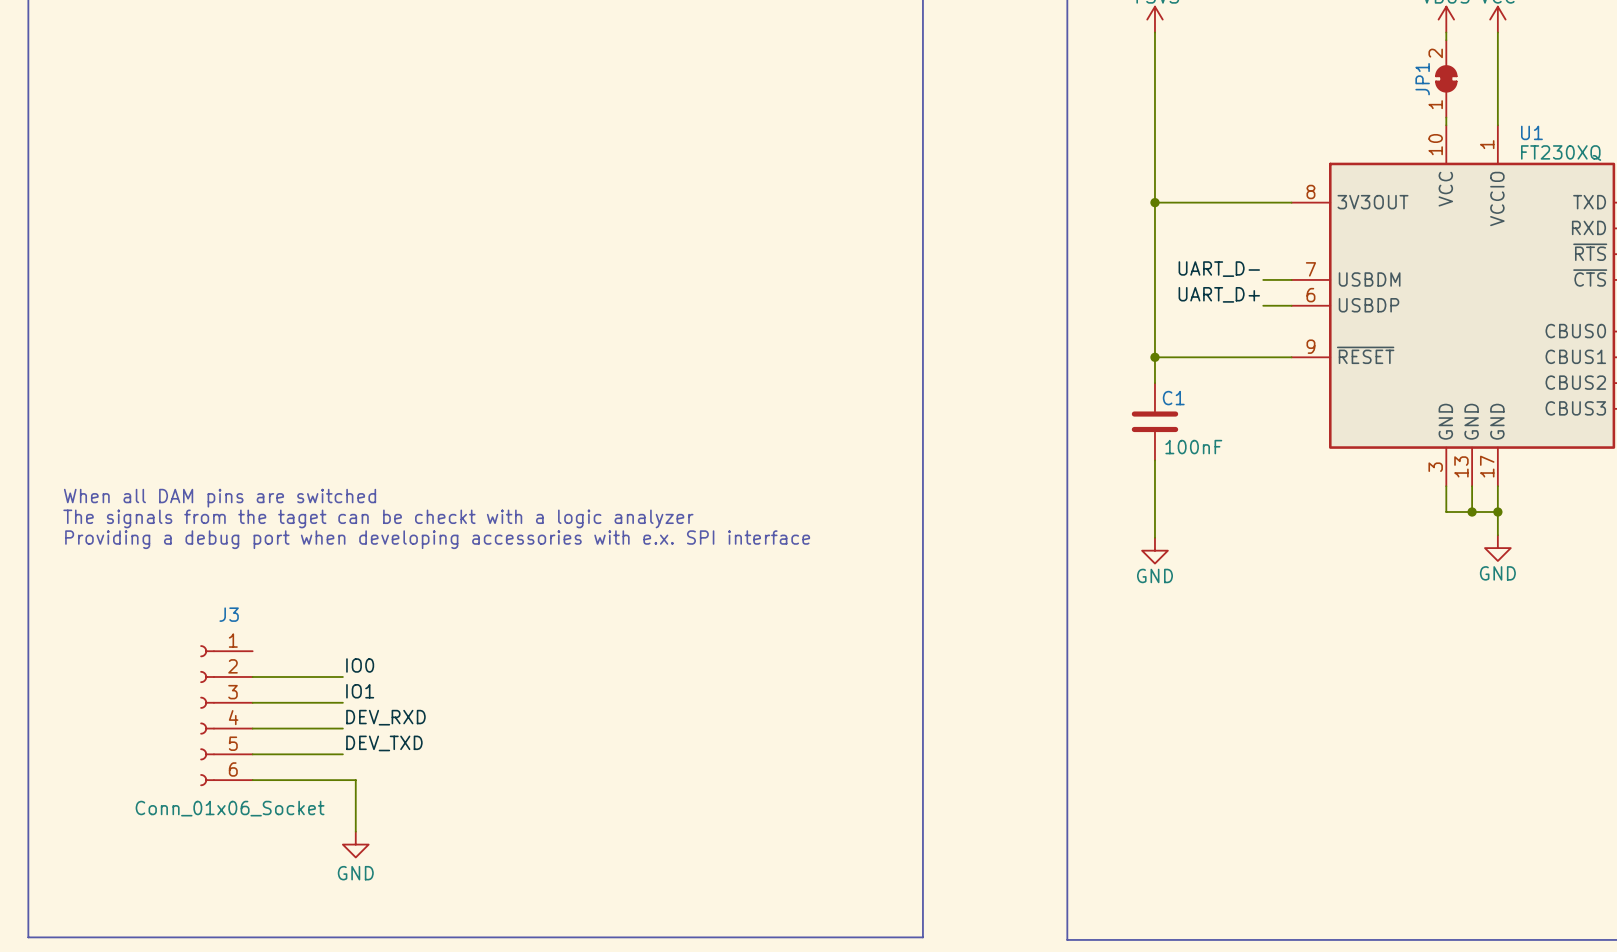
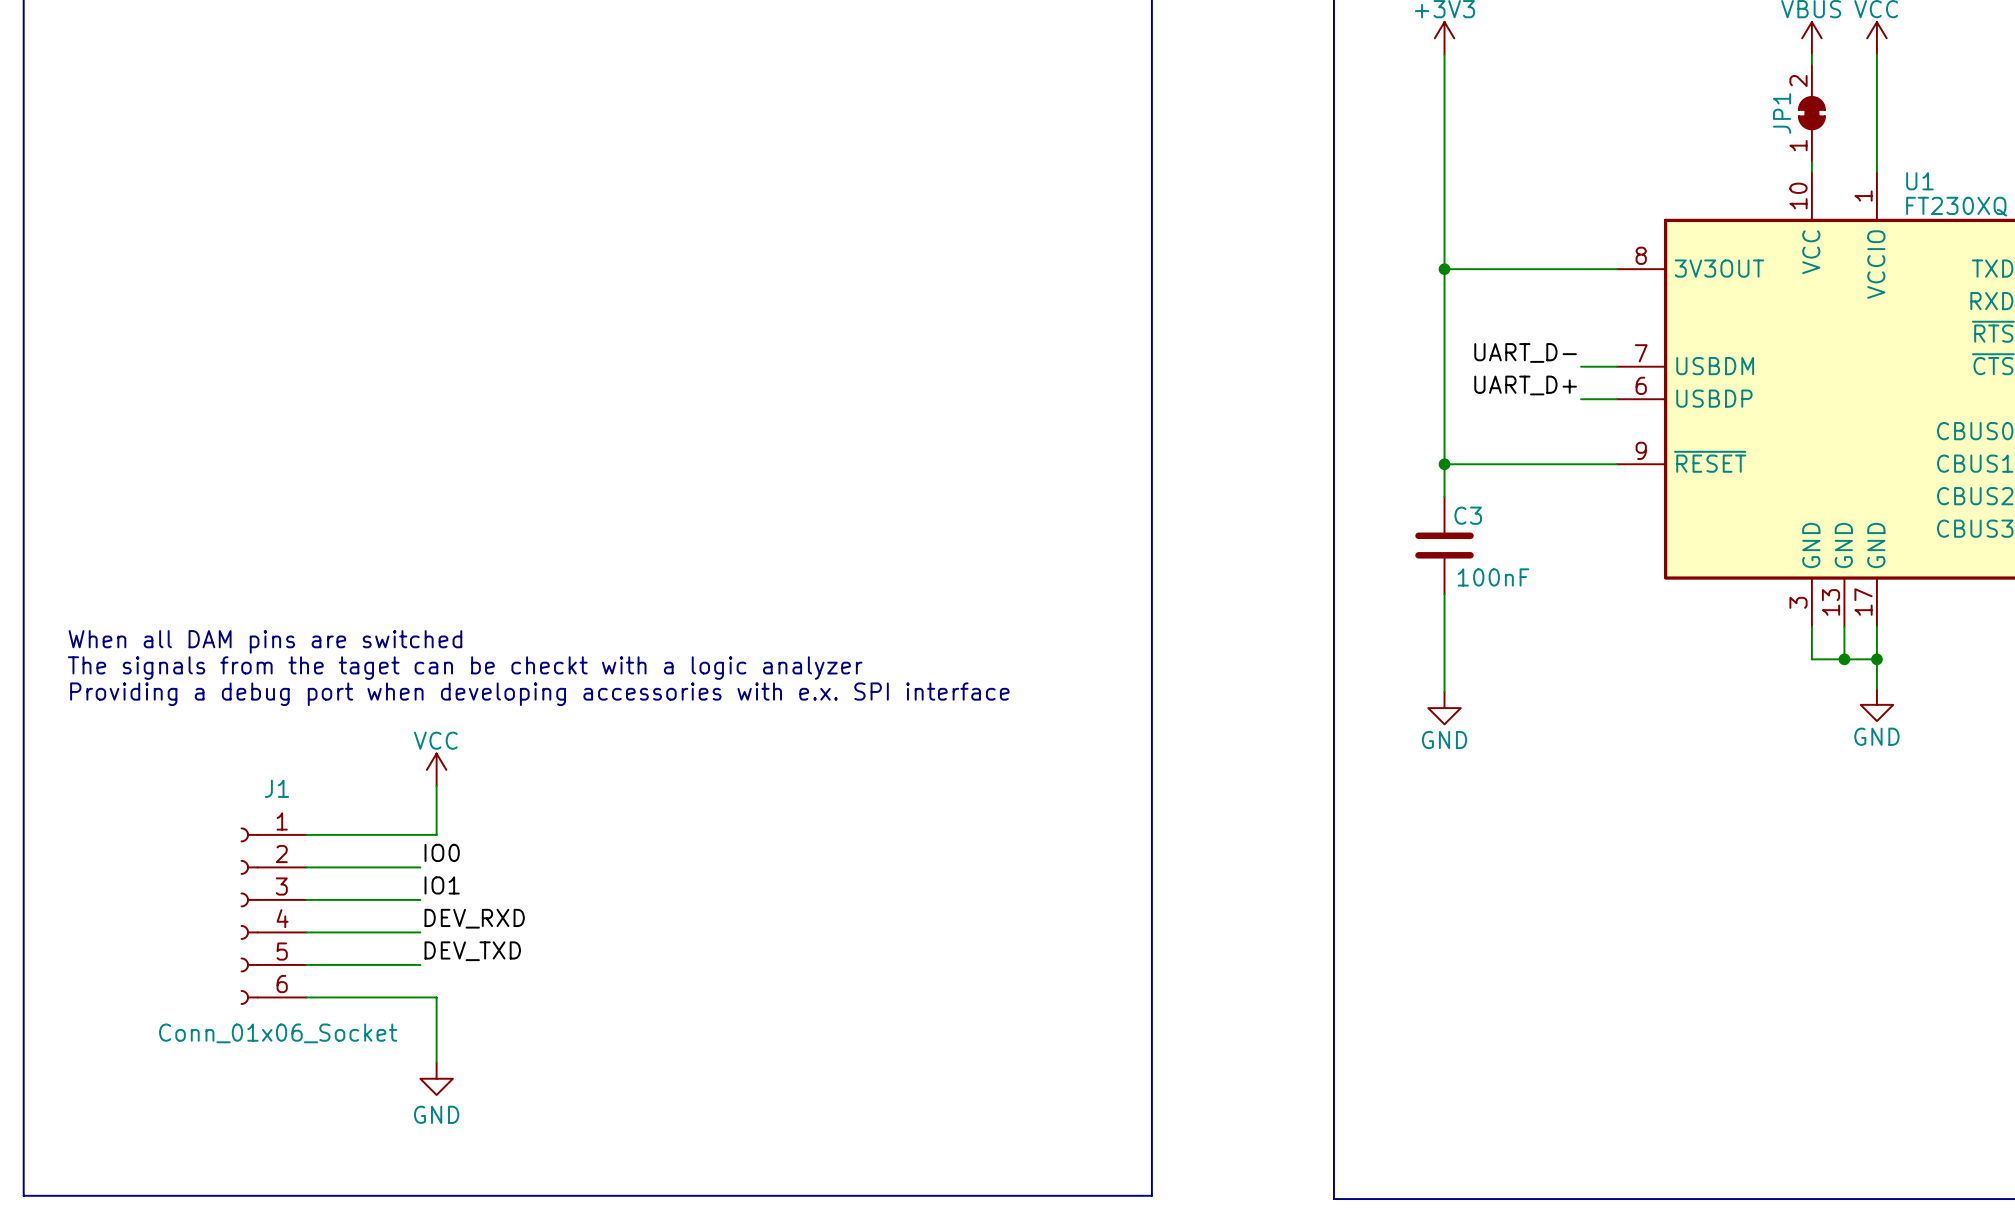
C1 name: C1 (1173, 398) -> C3 (1468, 515)
power symbol: none -> VCC (436, 769)
wire: none -> (436, 786) (436, 834) (306, 834)
J3 name: J3 (229, 614) -> J1 (276, 788)

